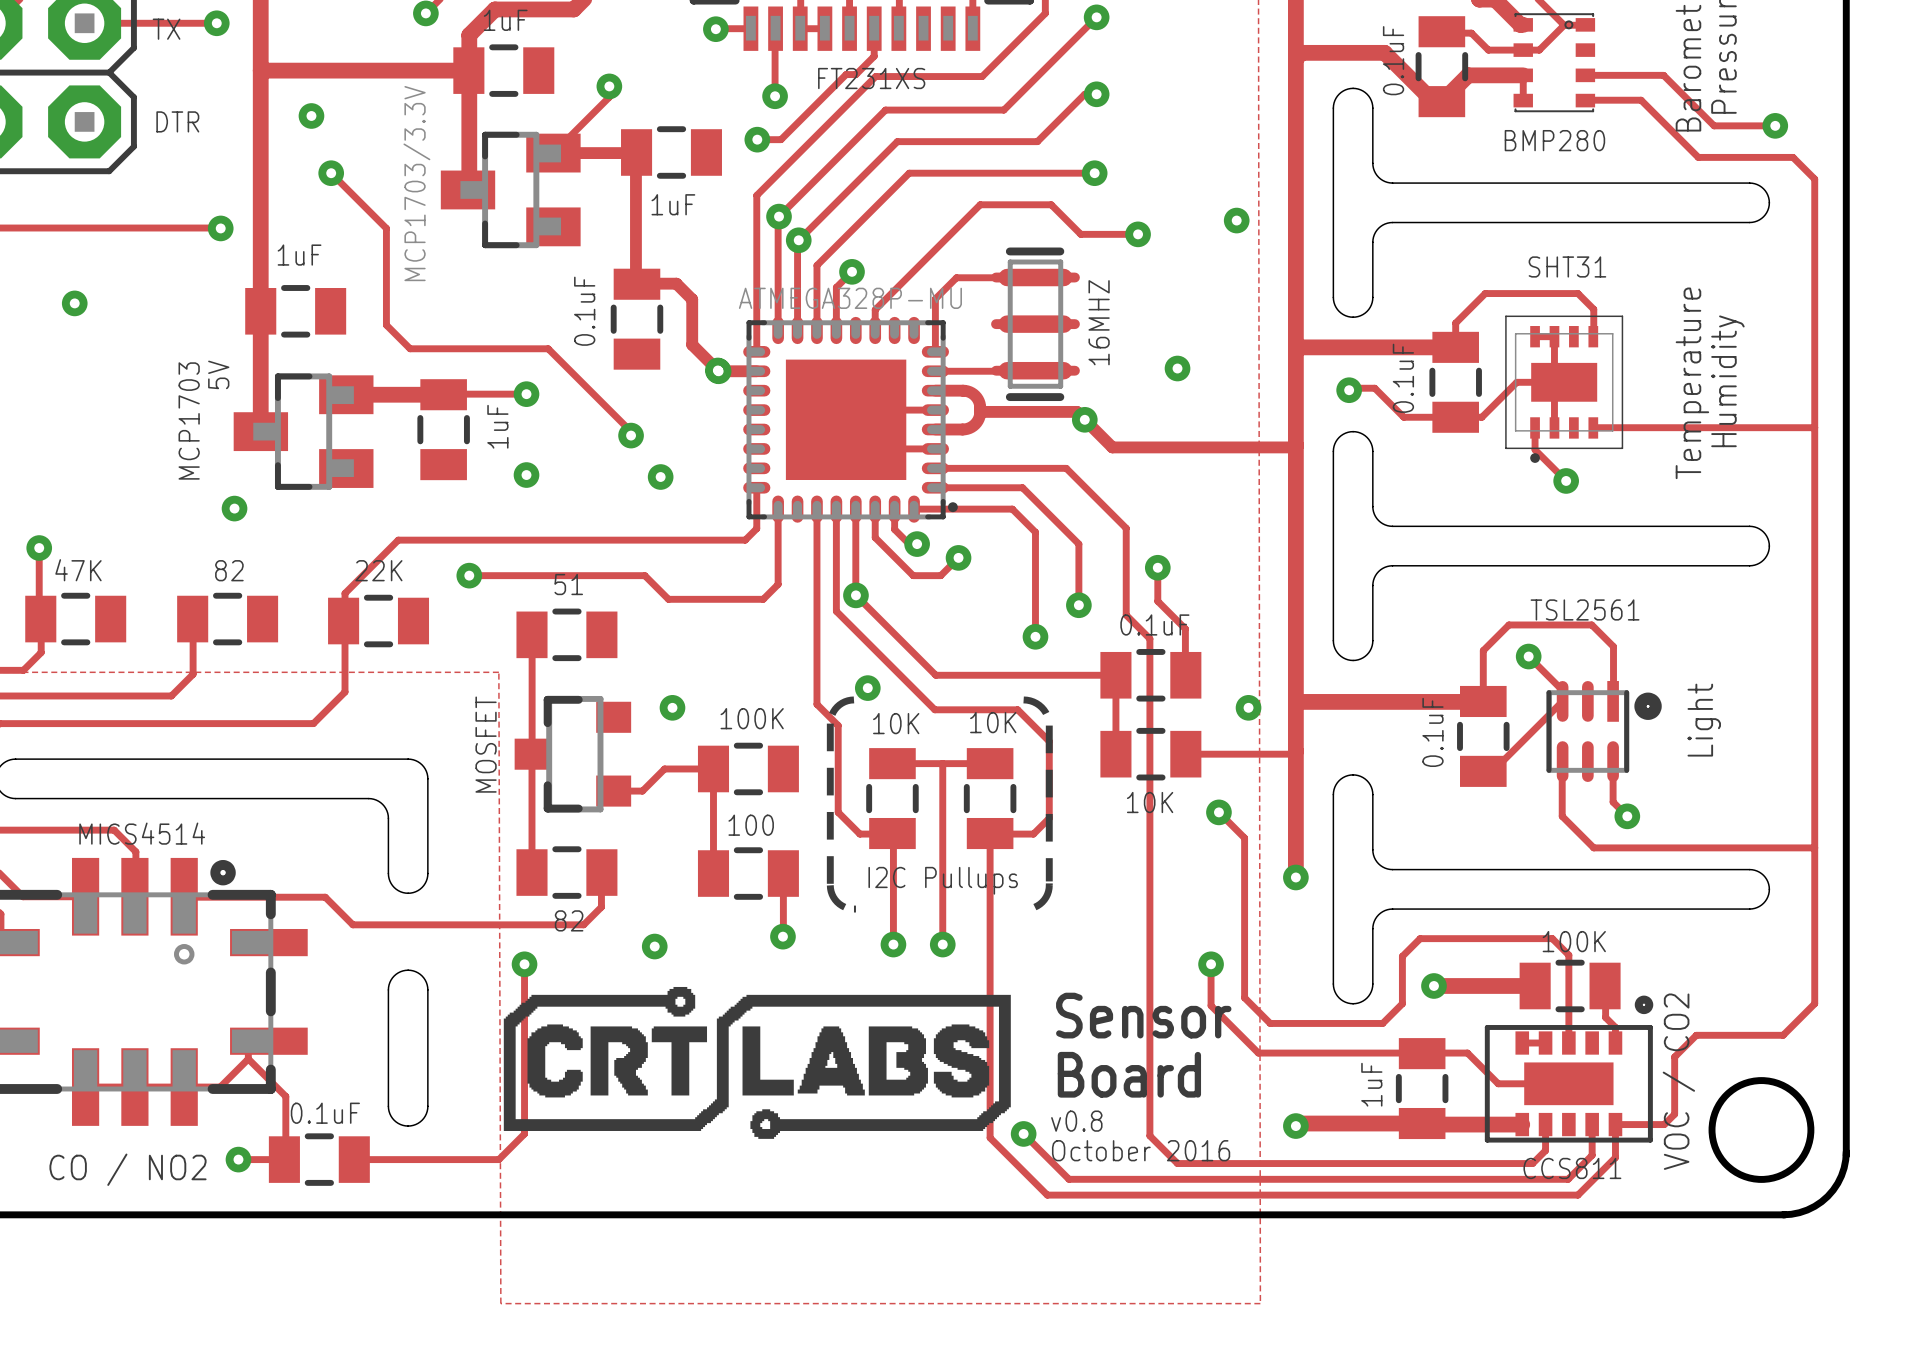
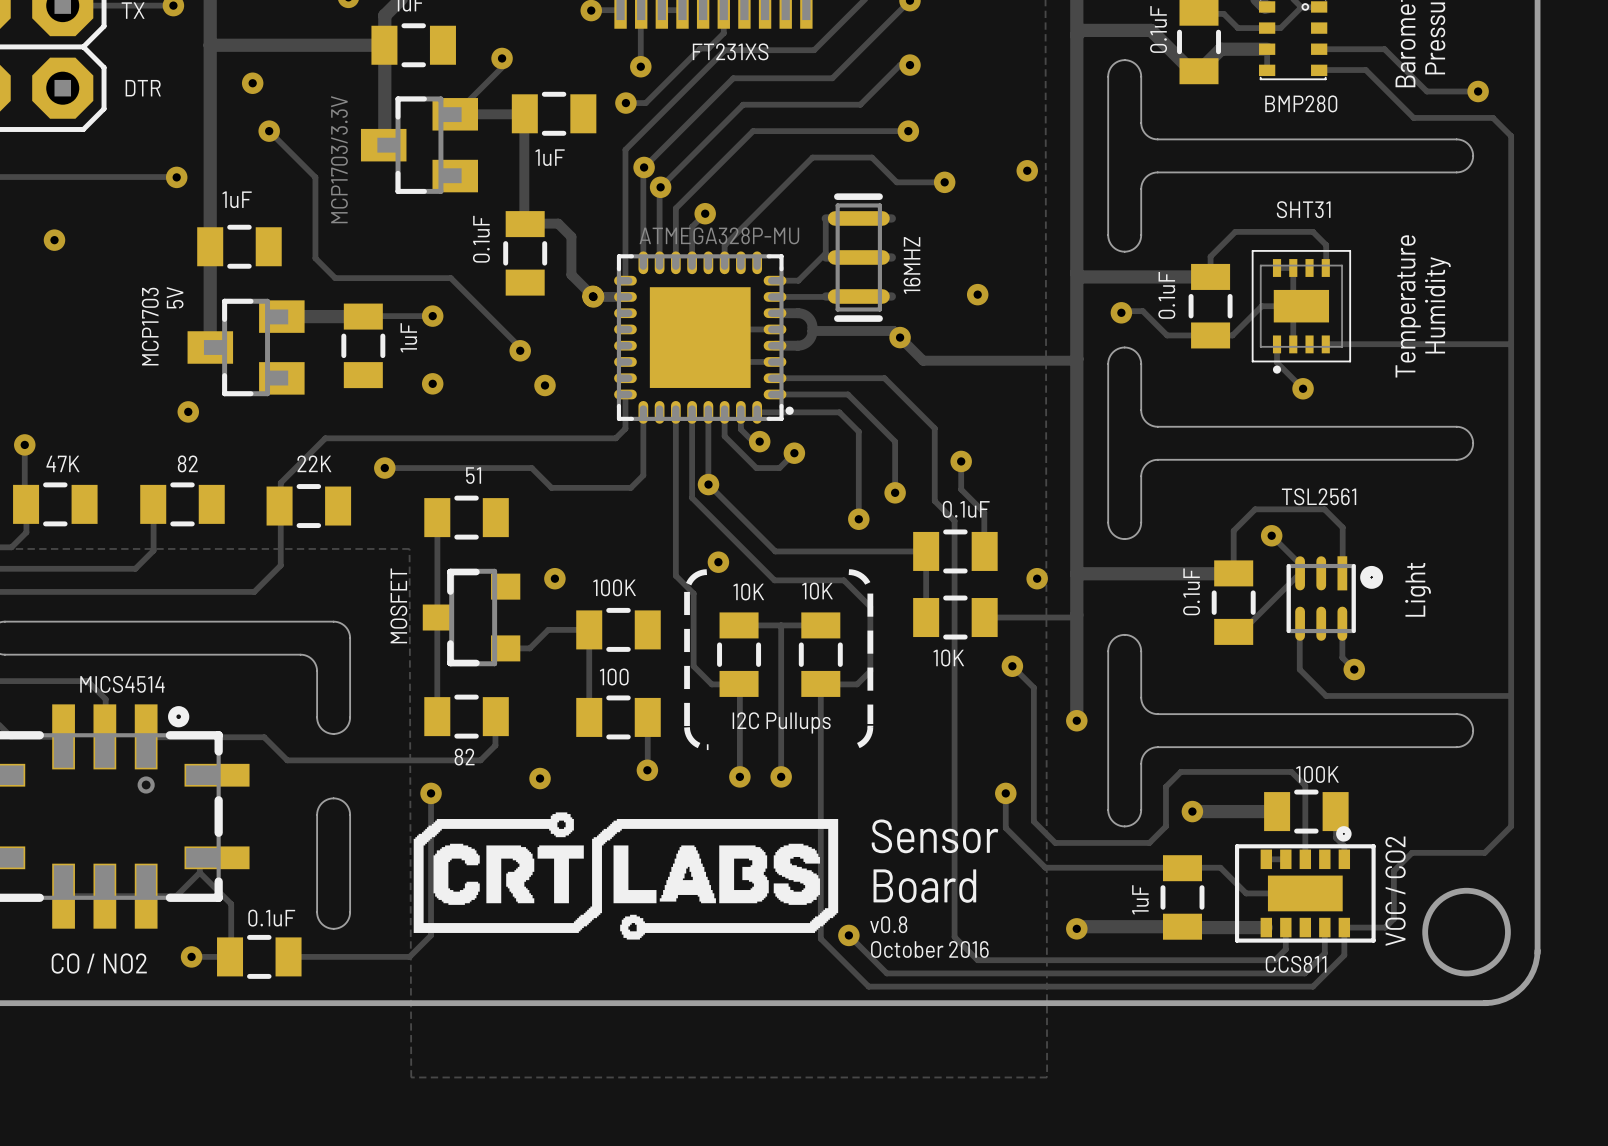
track: (995, 277) (956, 277) (935, 298) (935, 351) -> (825, 218) (825, 253) (798, 280) (775, 280)
part footprint: [1484, 995, 1654, 1143] -> [1234, 826, 1376, 943]

